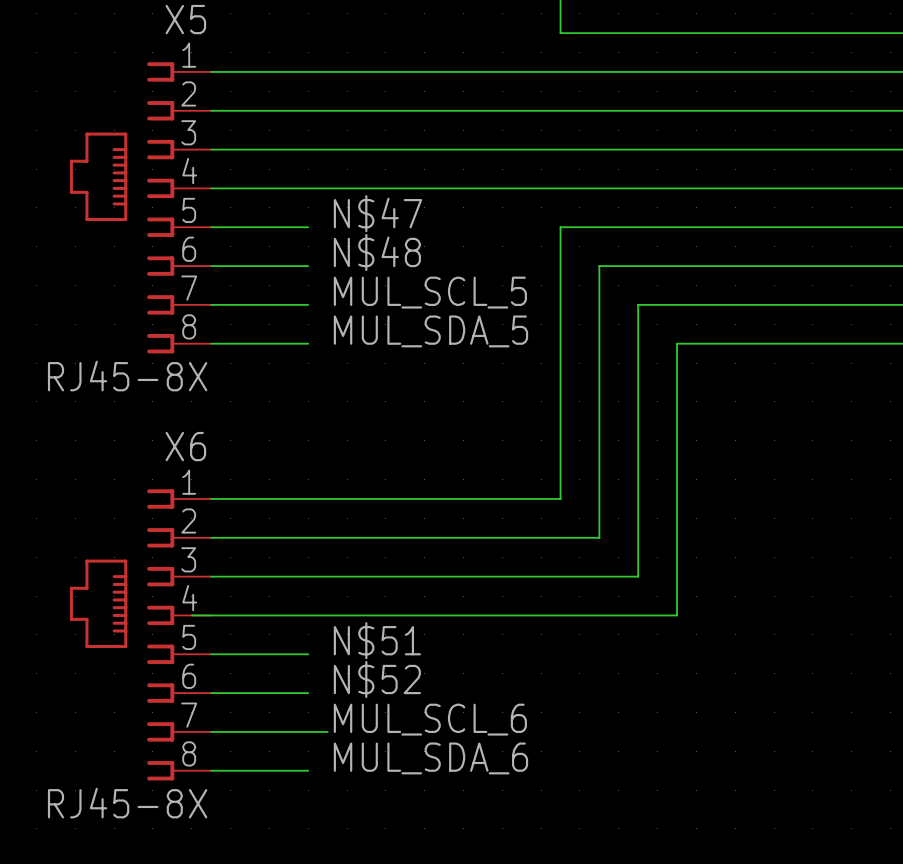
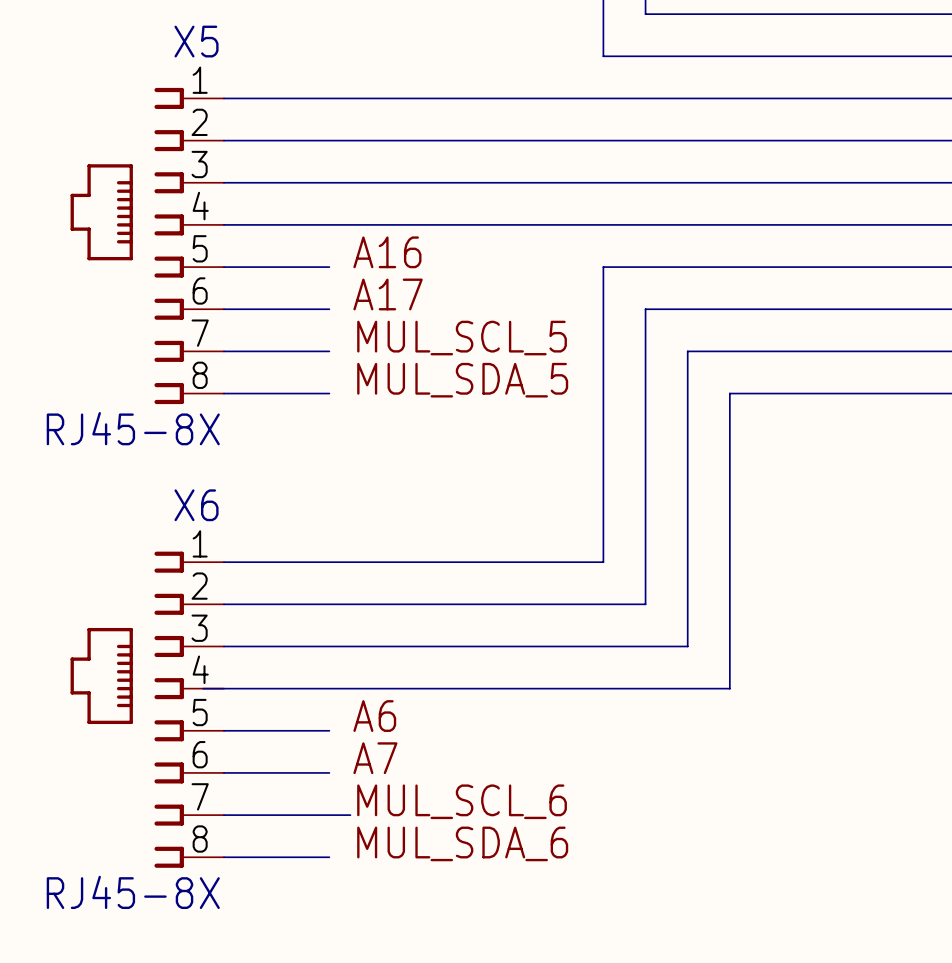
label: N$47 (377, 213) -> A16 (387, 252)
label: N$48 (377, 252) -> A17 (388, 294)
label: N$51 (377, 640) -> A6 (374, 716)
label: N$52 (377, 679) -> A7 (375, 758)

